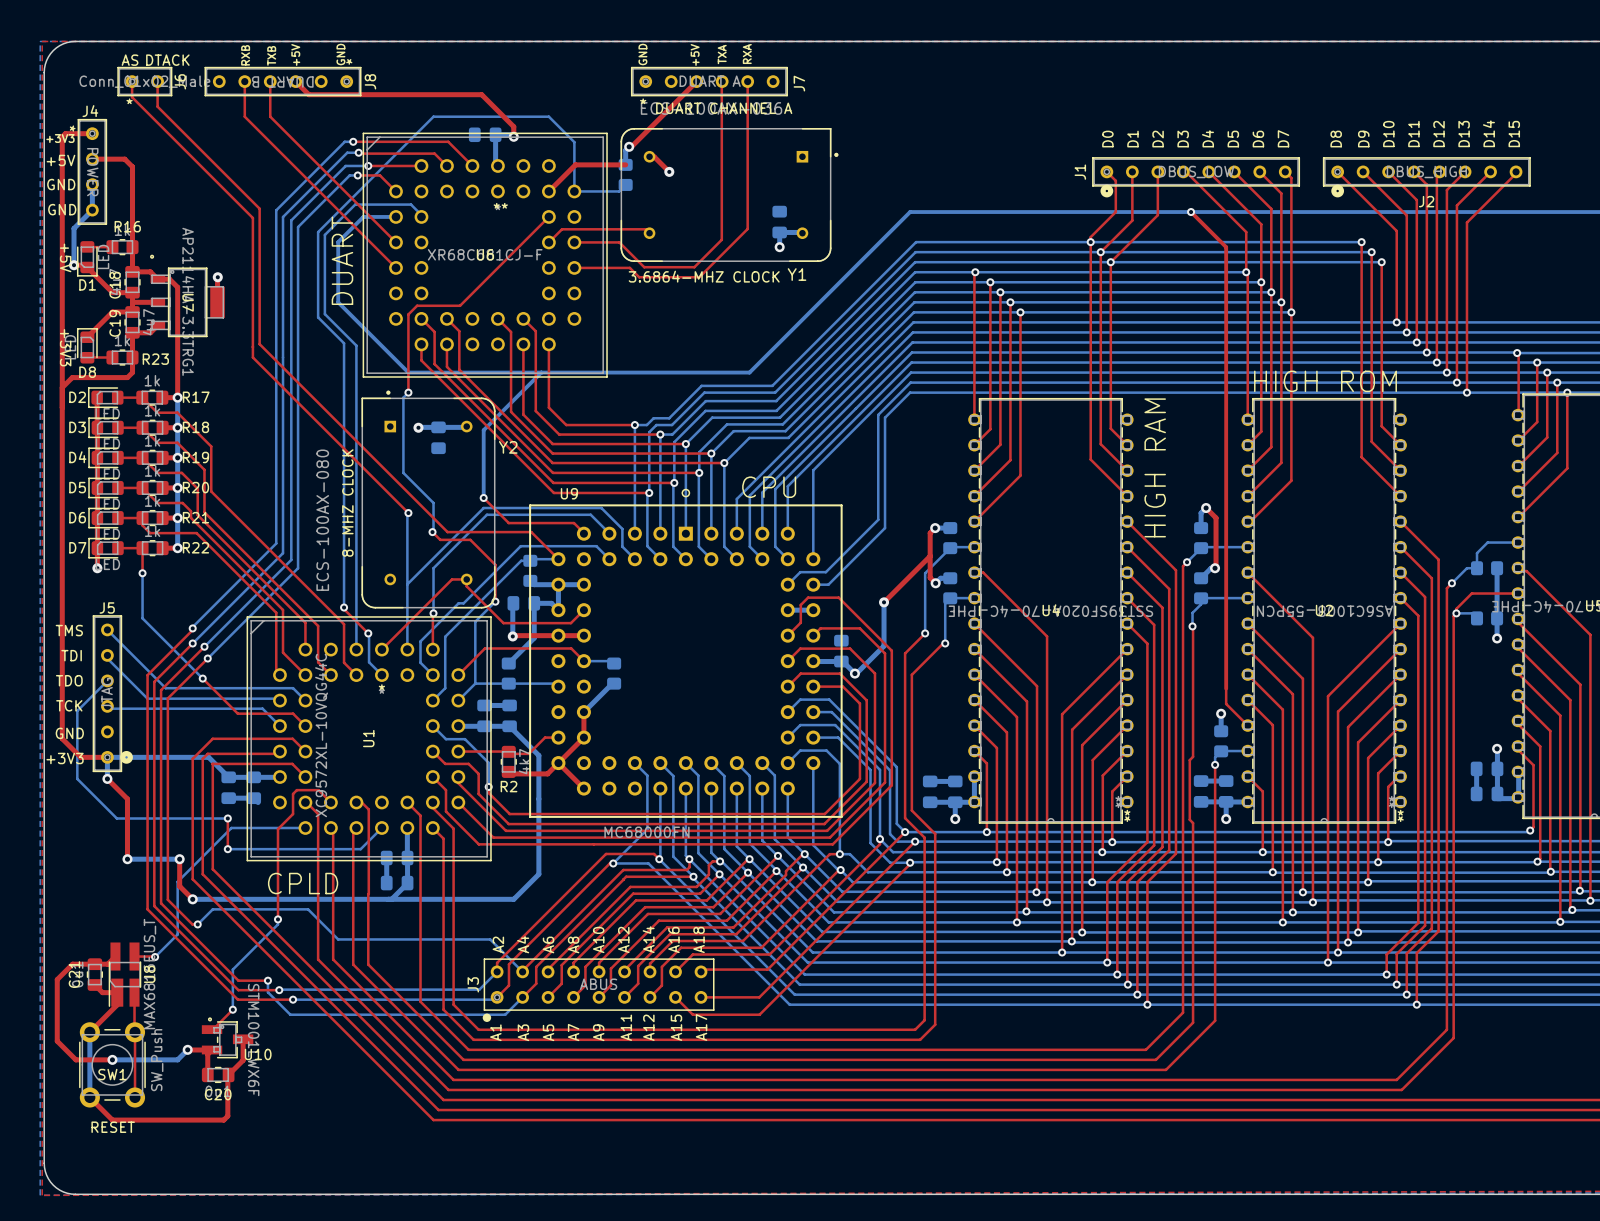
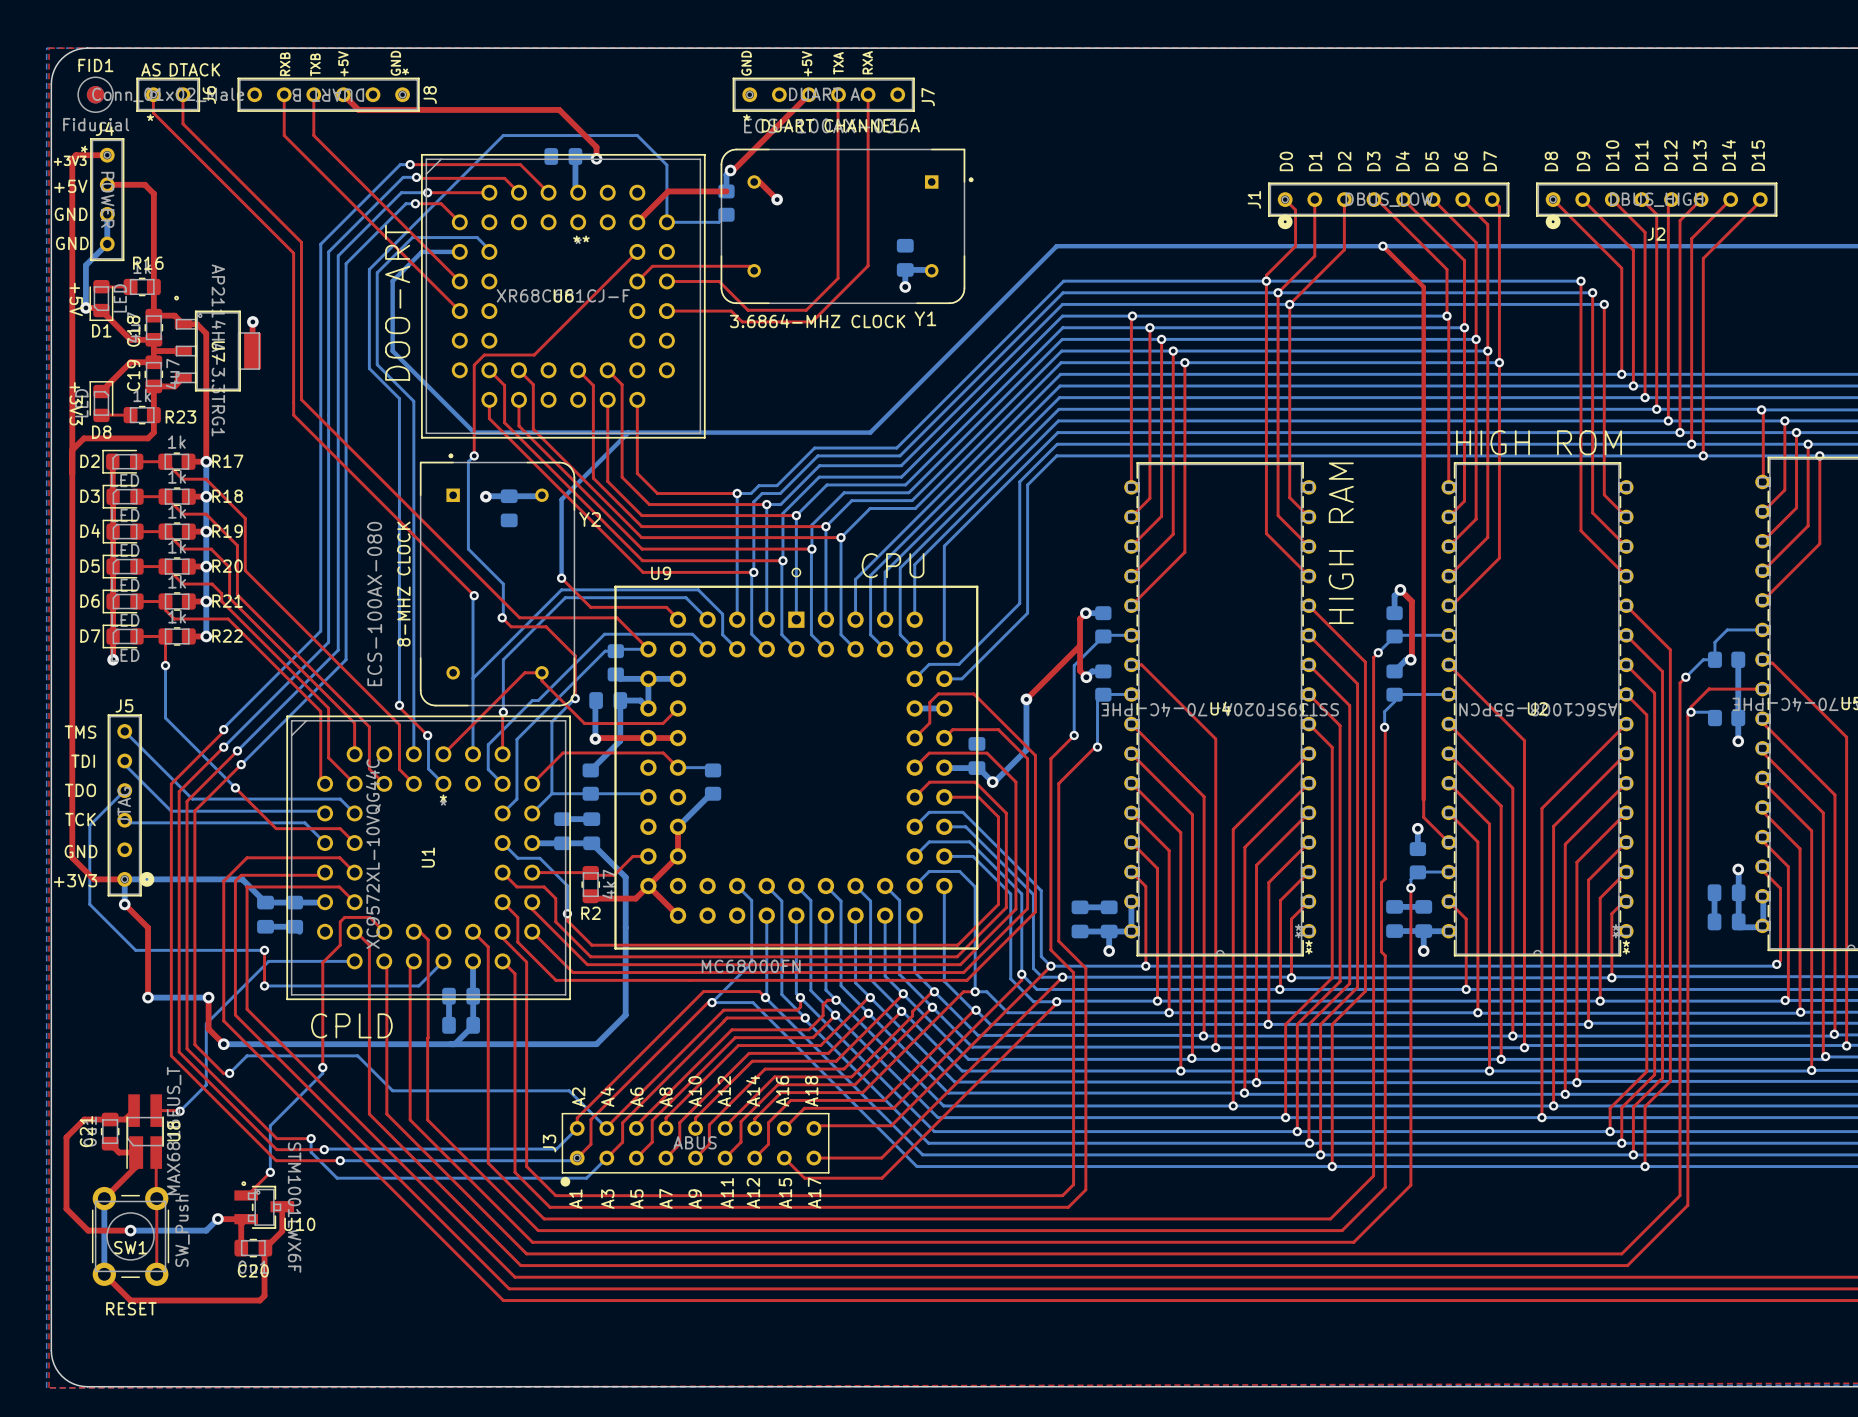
FID1: none -> Fiducial (95, 94)
text: DUART (342, 260) -> DOO-ART (397, 302)

